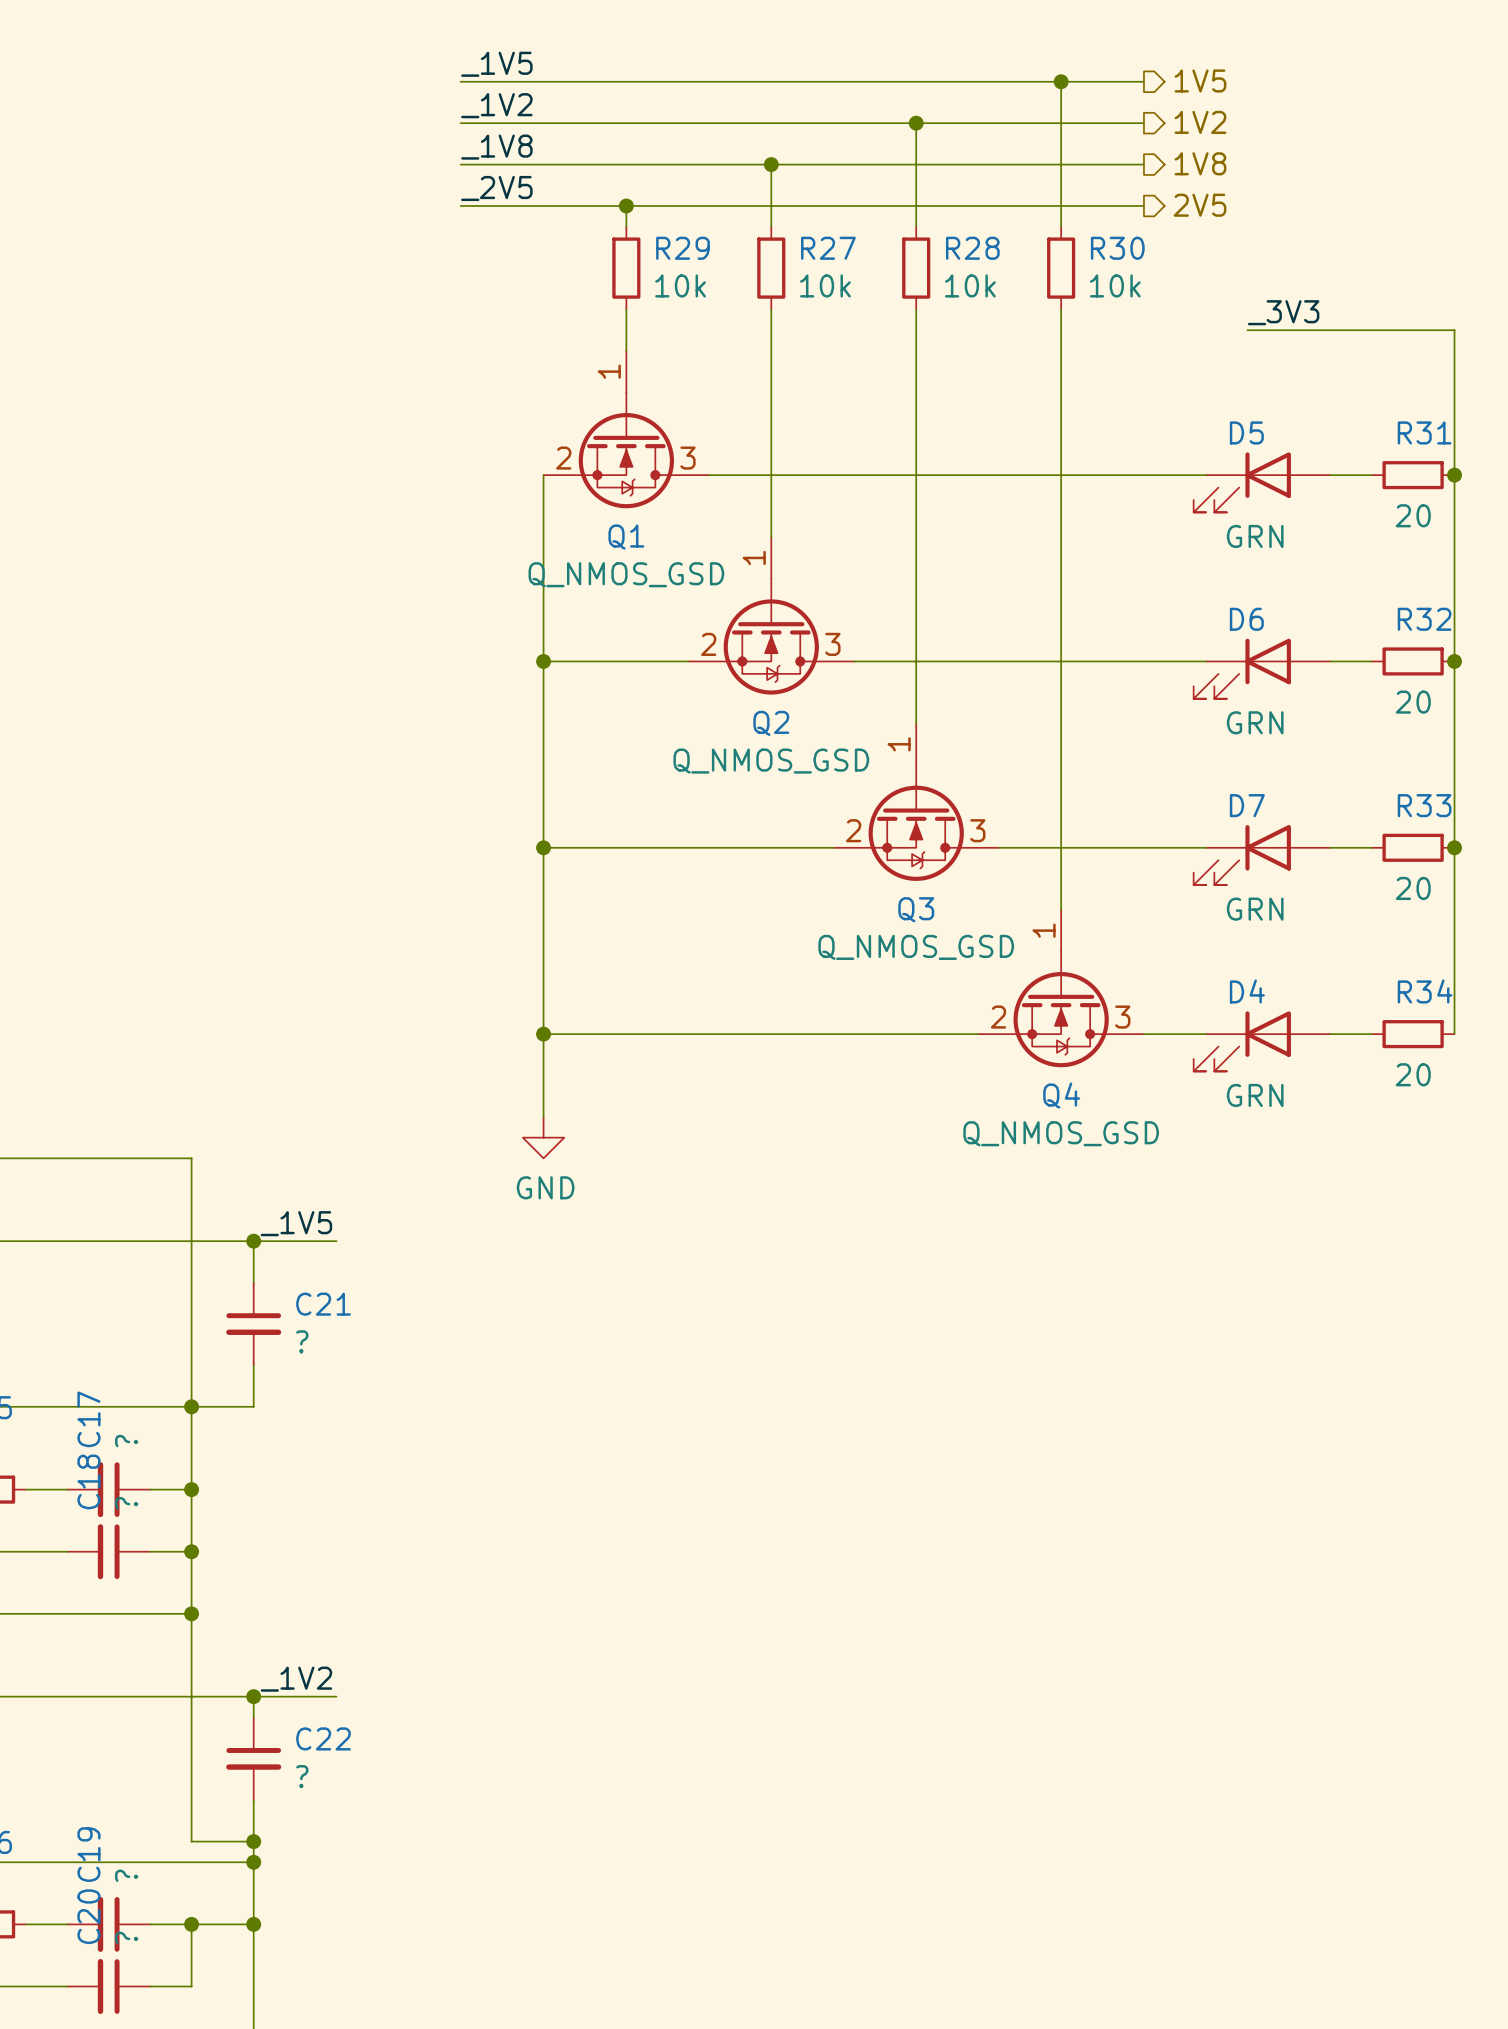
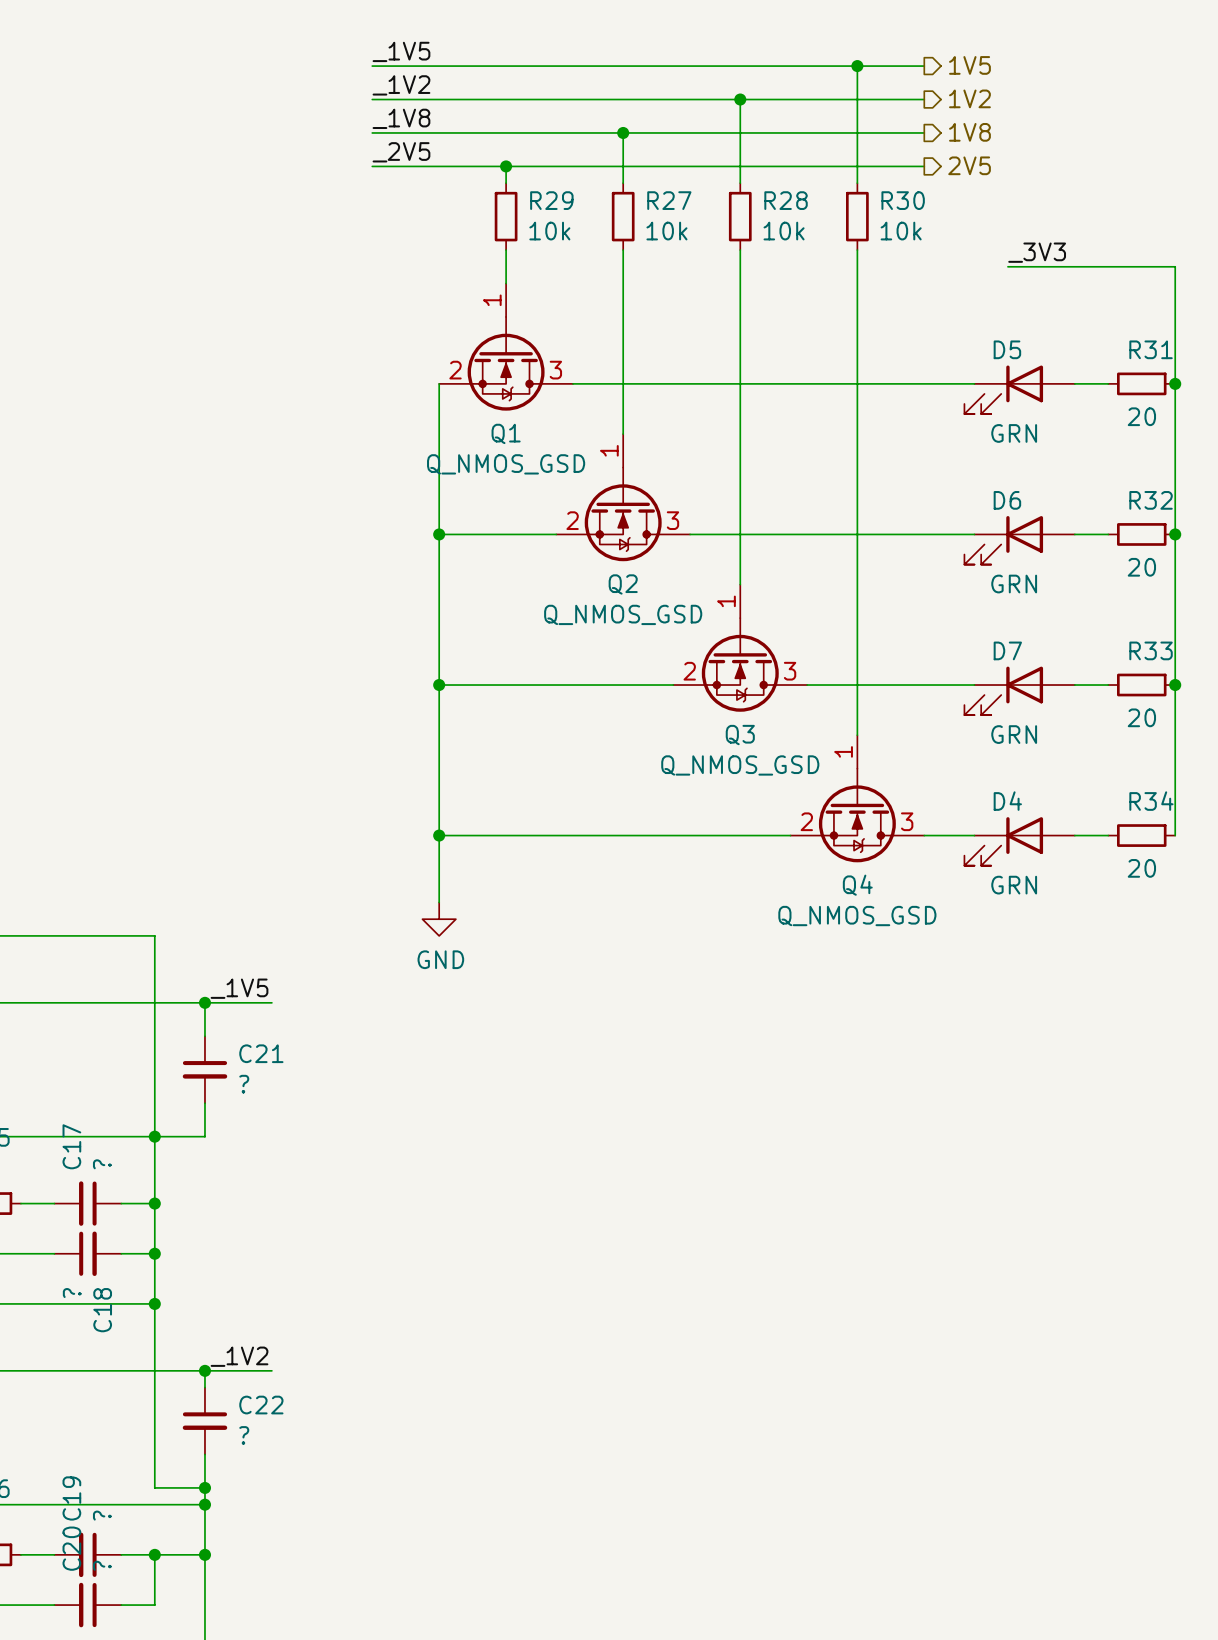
C18 rotation: 0° (108, 1551) -> 180° (87, 1253)

